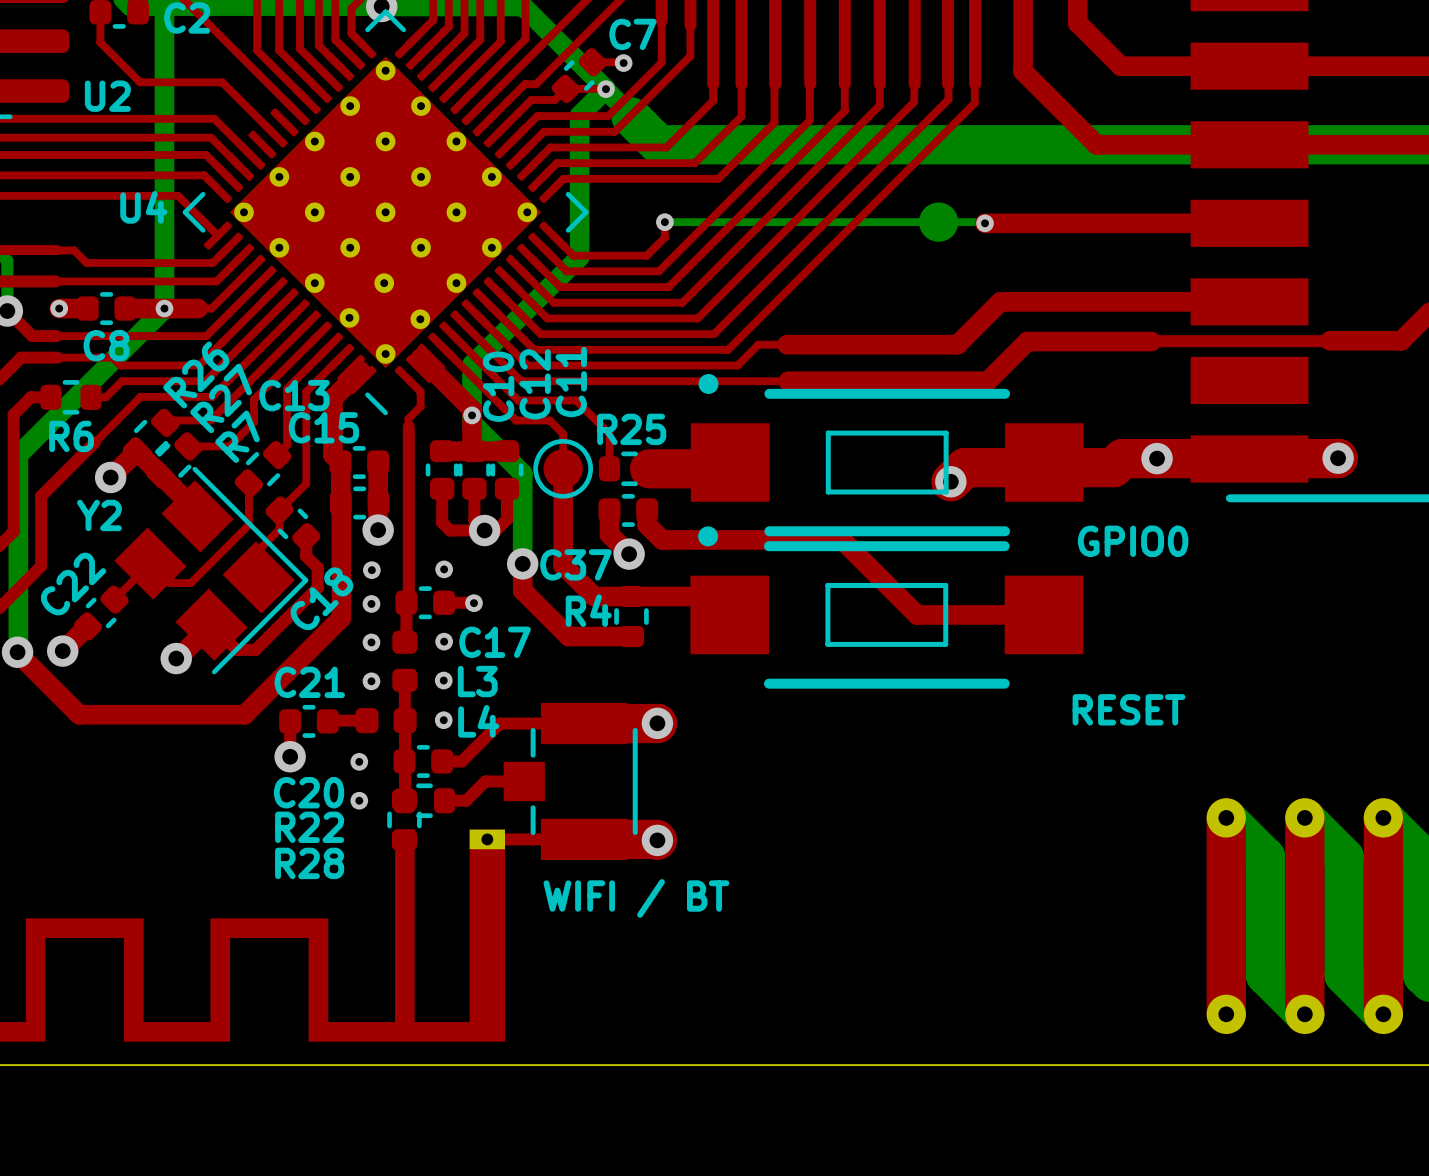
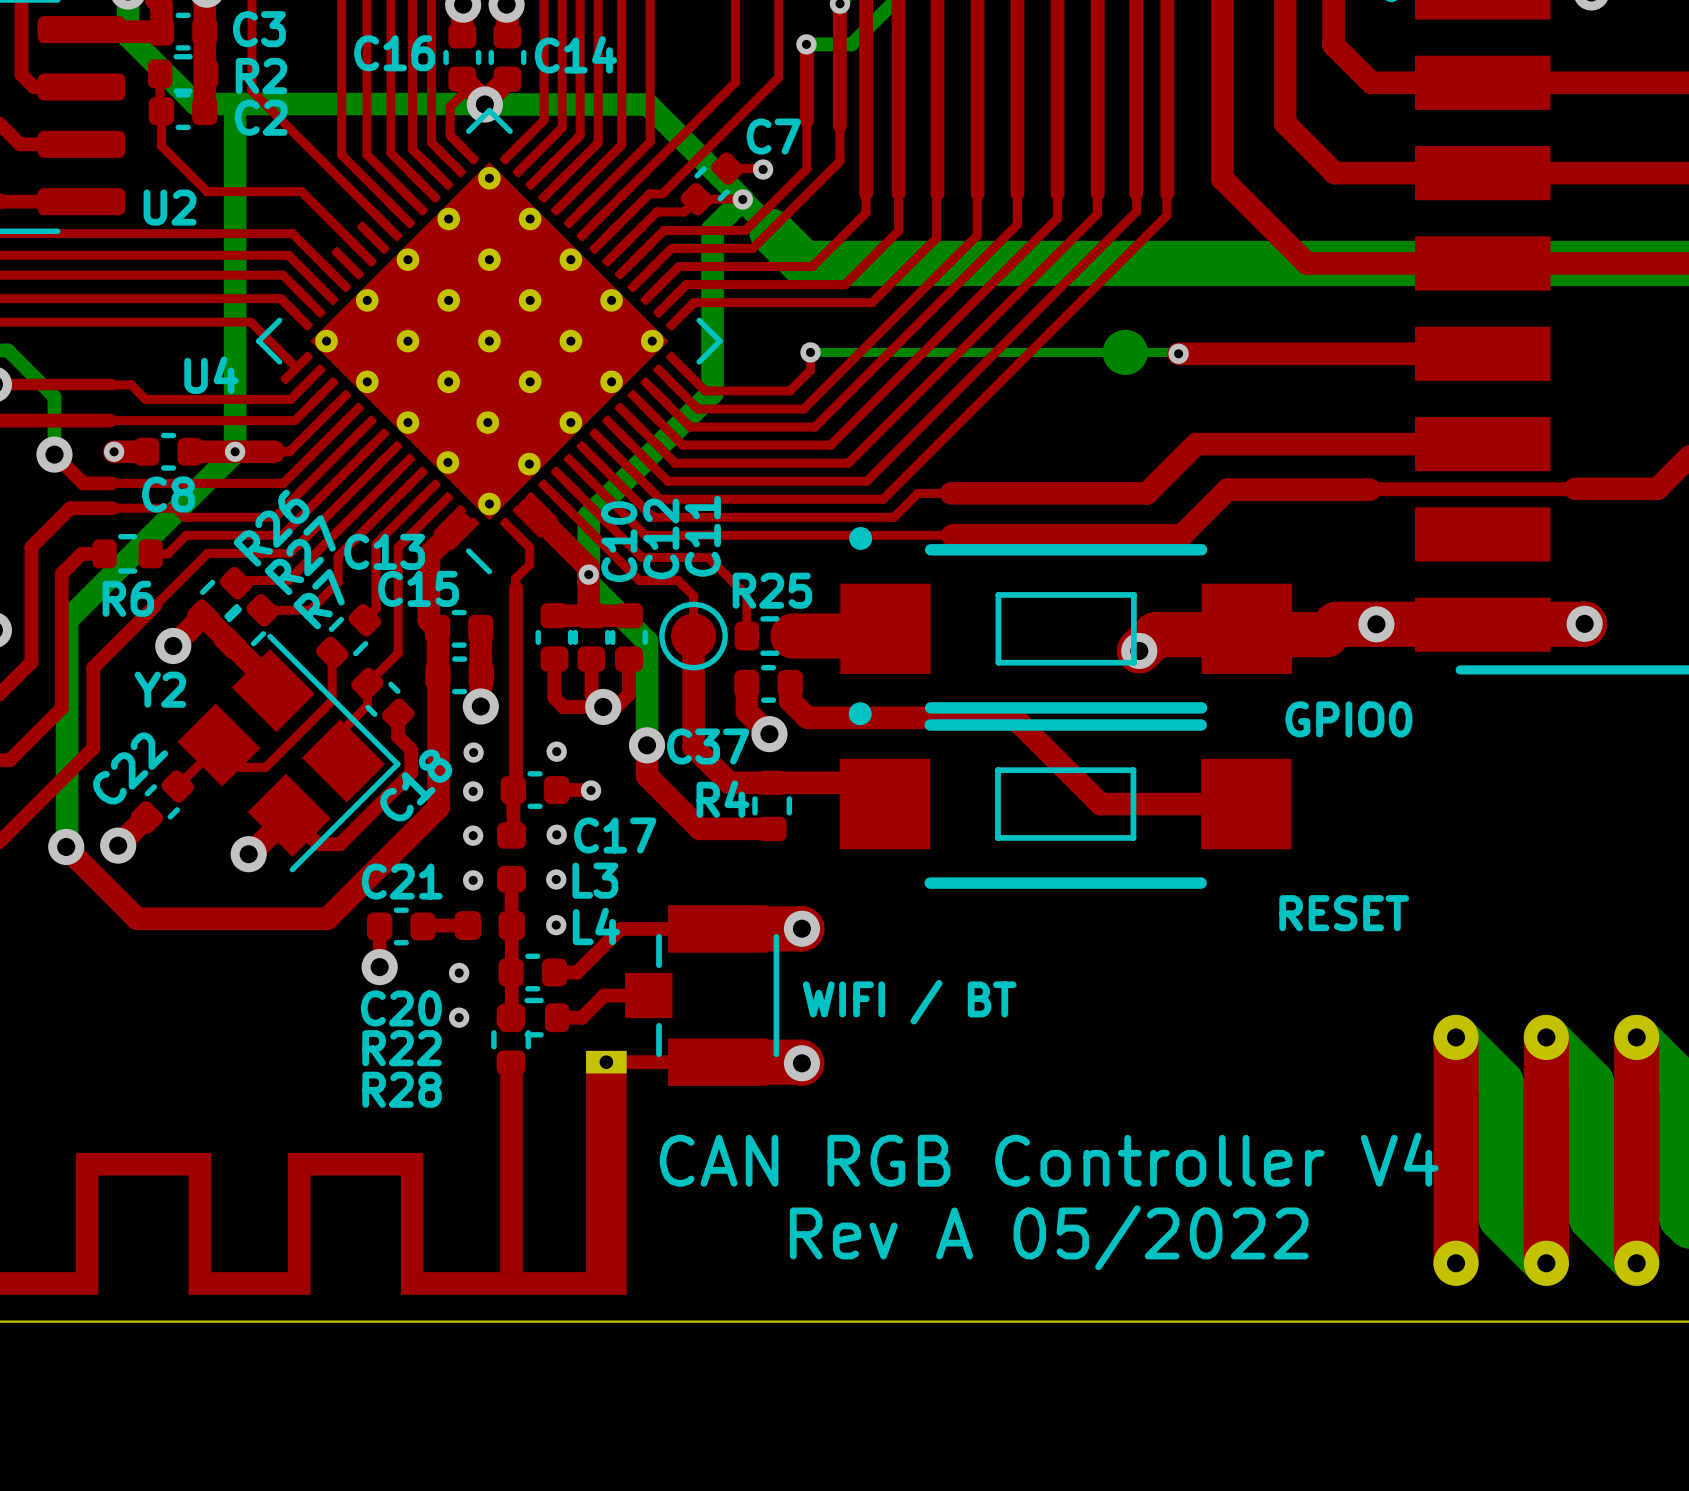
U4 name position: U4 (143, 207) -> U4 (211, 375)
text position: WIFI / BT (636, 898) -> WIFI / BT (909, 1002)
text: none -> CAN RGB Controller V4 (1049, 1159)
text: none -> Rev A 05/2022 (1049, 1237)

